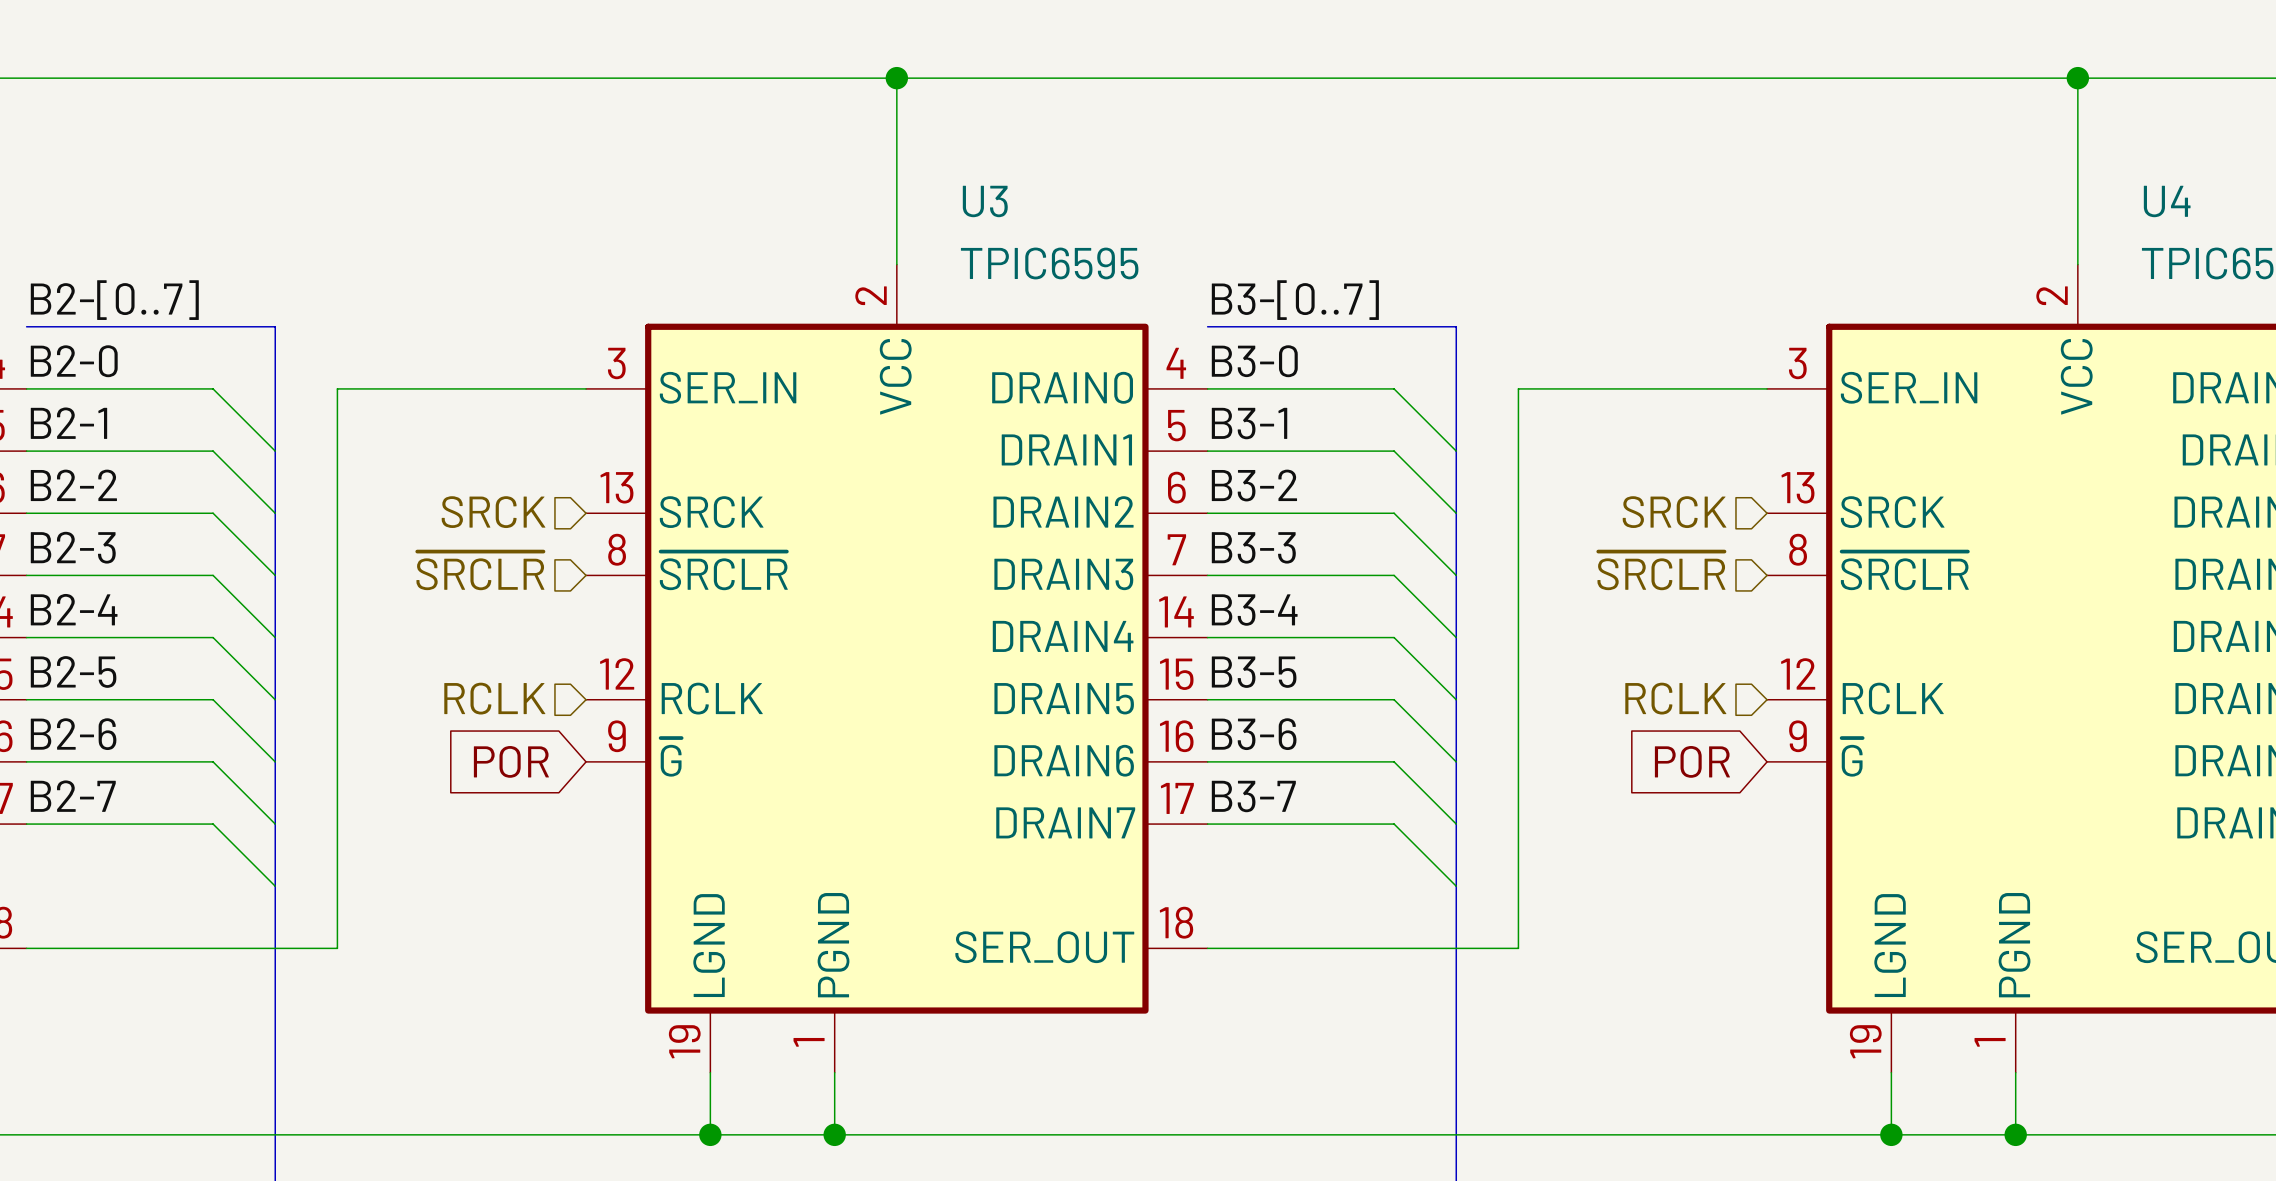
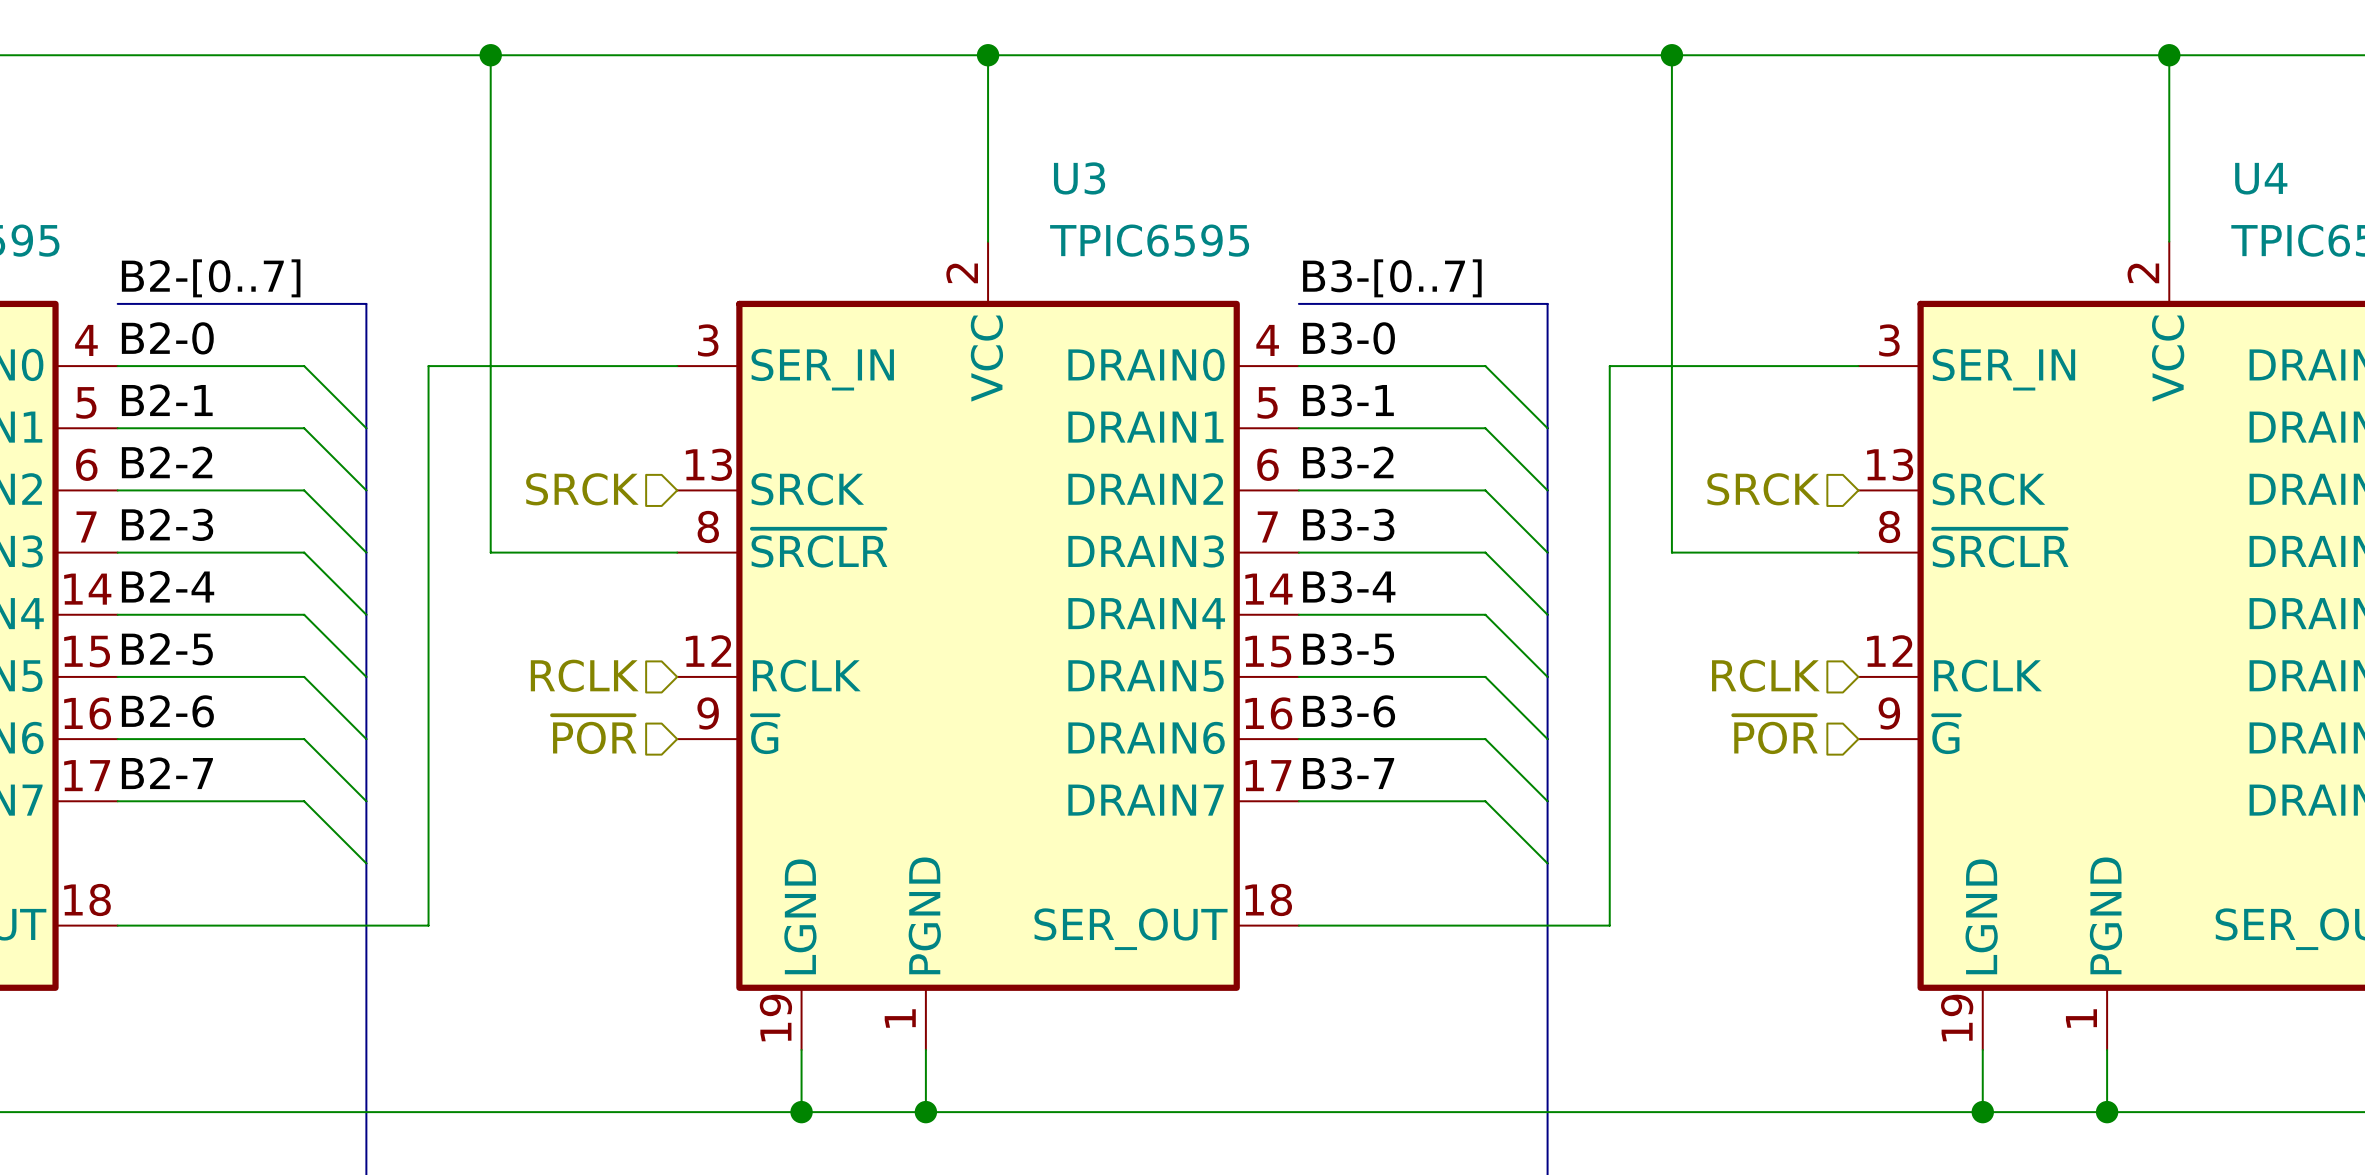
wire: none -> (490, 55) (490, 552) (677, 552)
junction: none -> (490, 55)
wire: none -> (1671, 55) (1671, 552) (1858, 552)
junction: none -> (1671, 55)
hierarchical label: ~{SRCLR} (480, 570) -> none
hierarchical label: ~{SRCLR} (1661, 570) -> none
hierarchical label: none -> ~{POR} (594, 734)
hierarchical label: none -> ~{POR} (1775, 734)
global label: POR (511, 761) -> none
global label: POR (1692, 761) -> none

